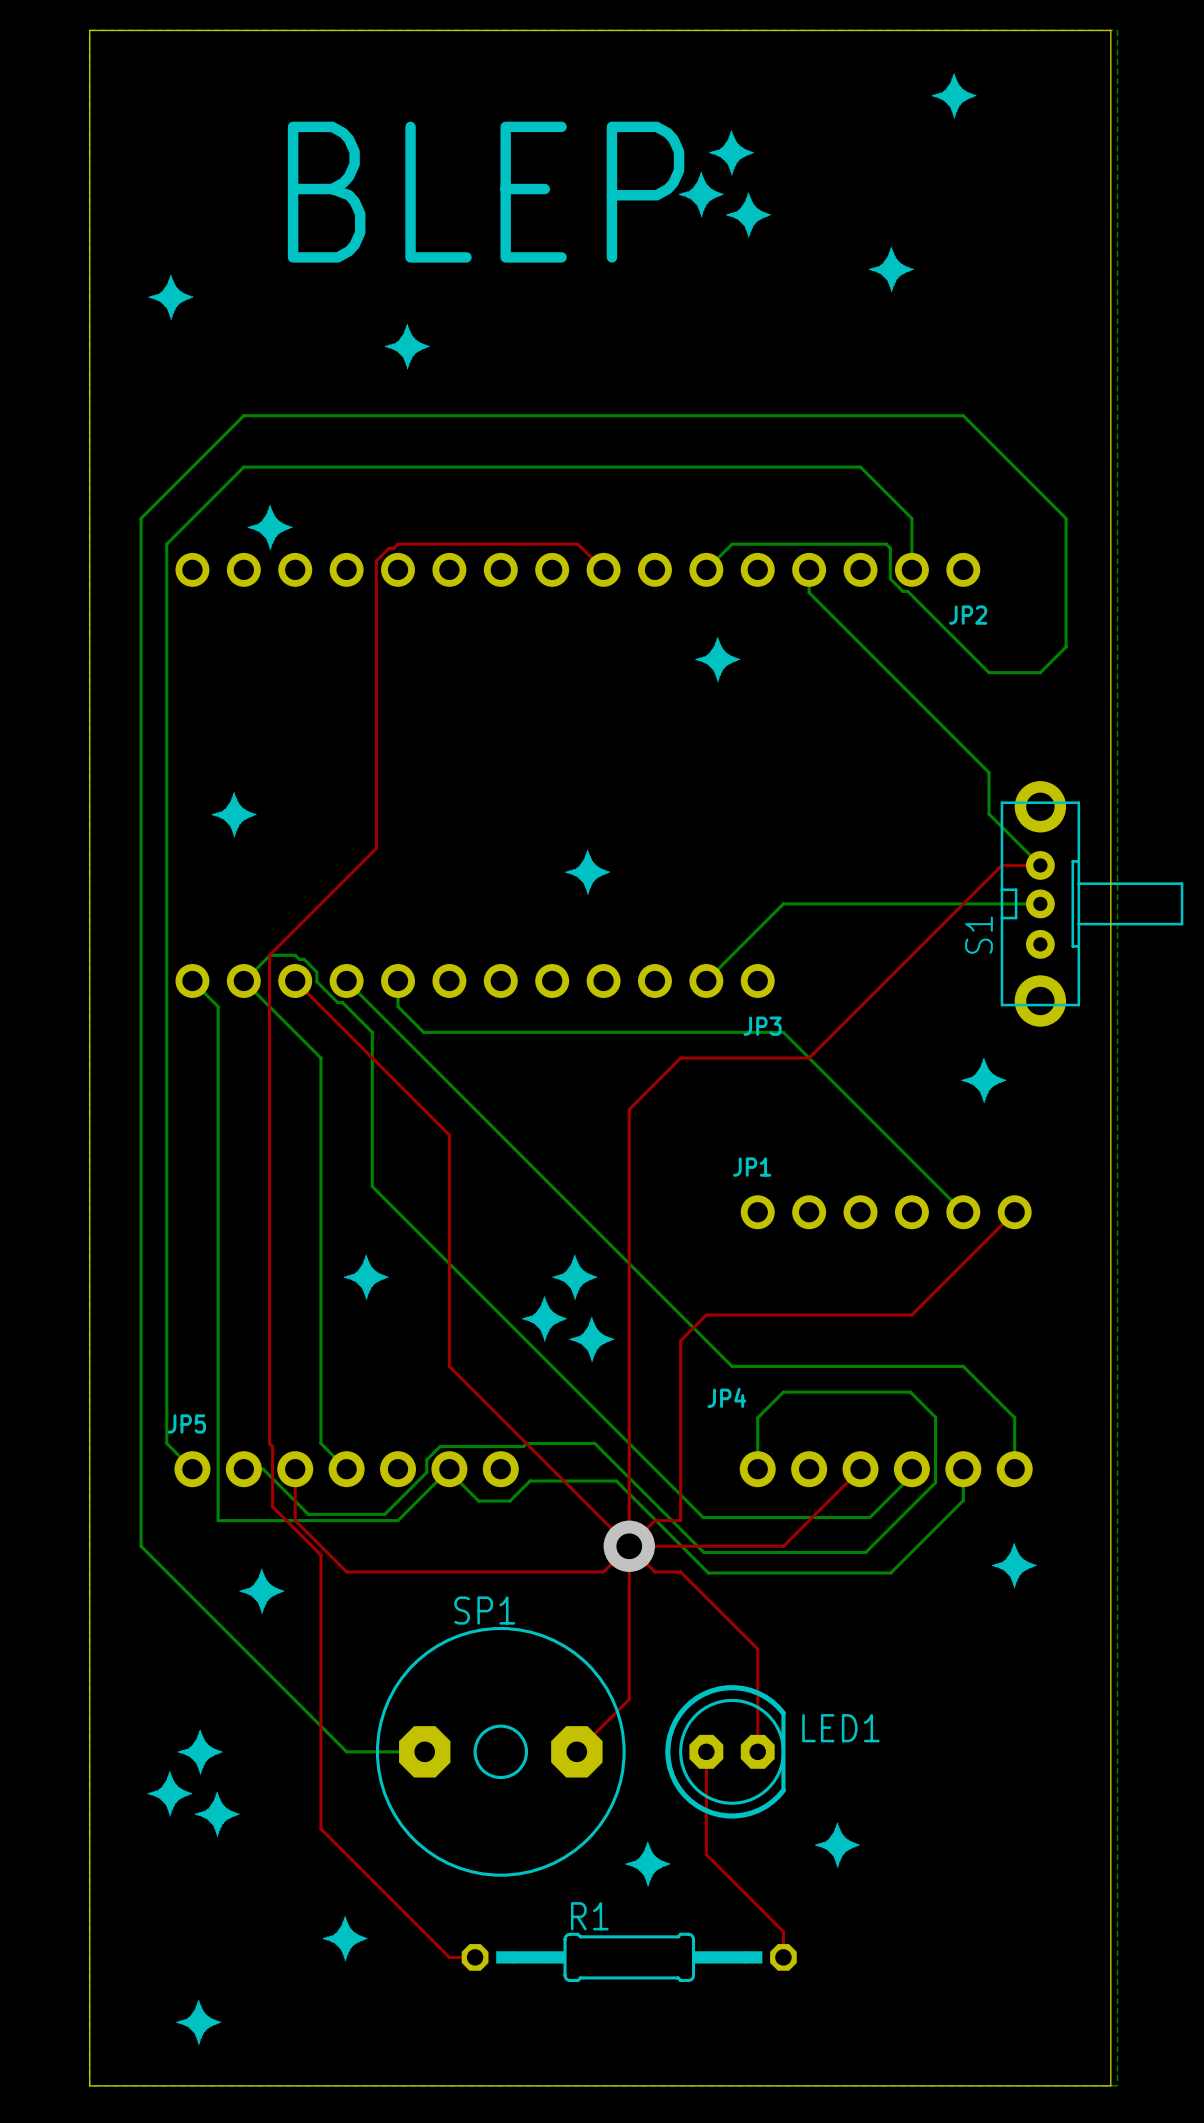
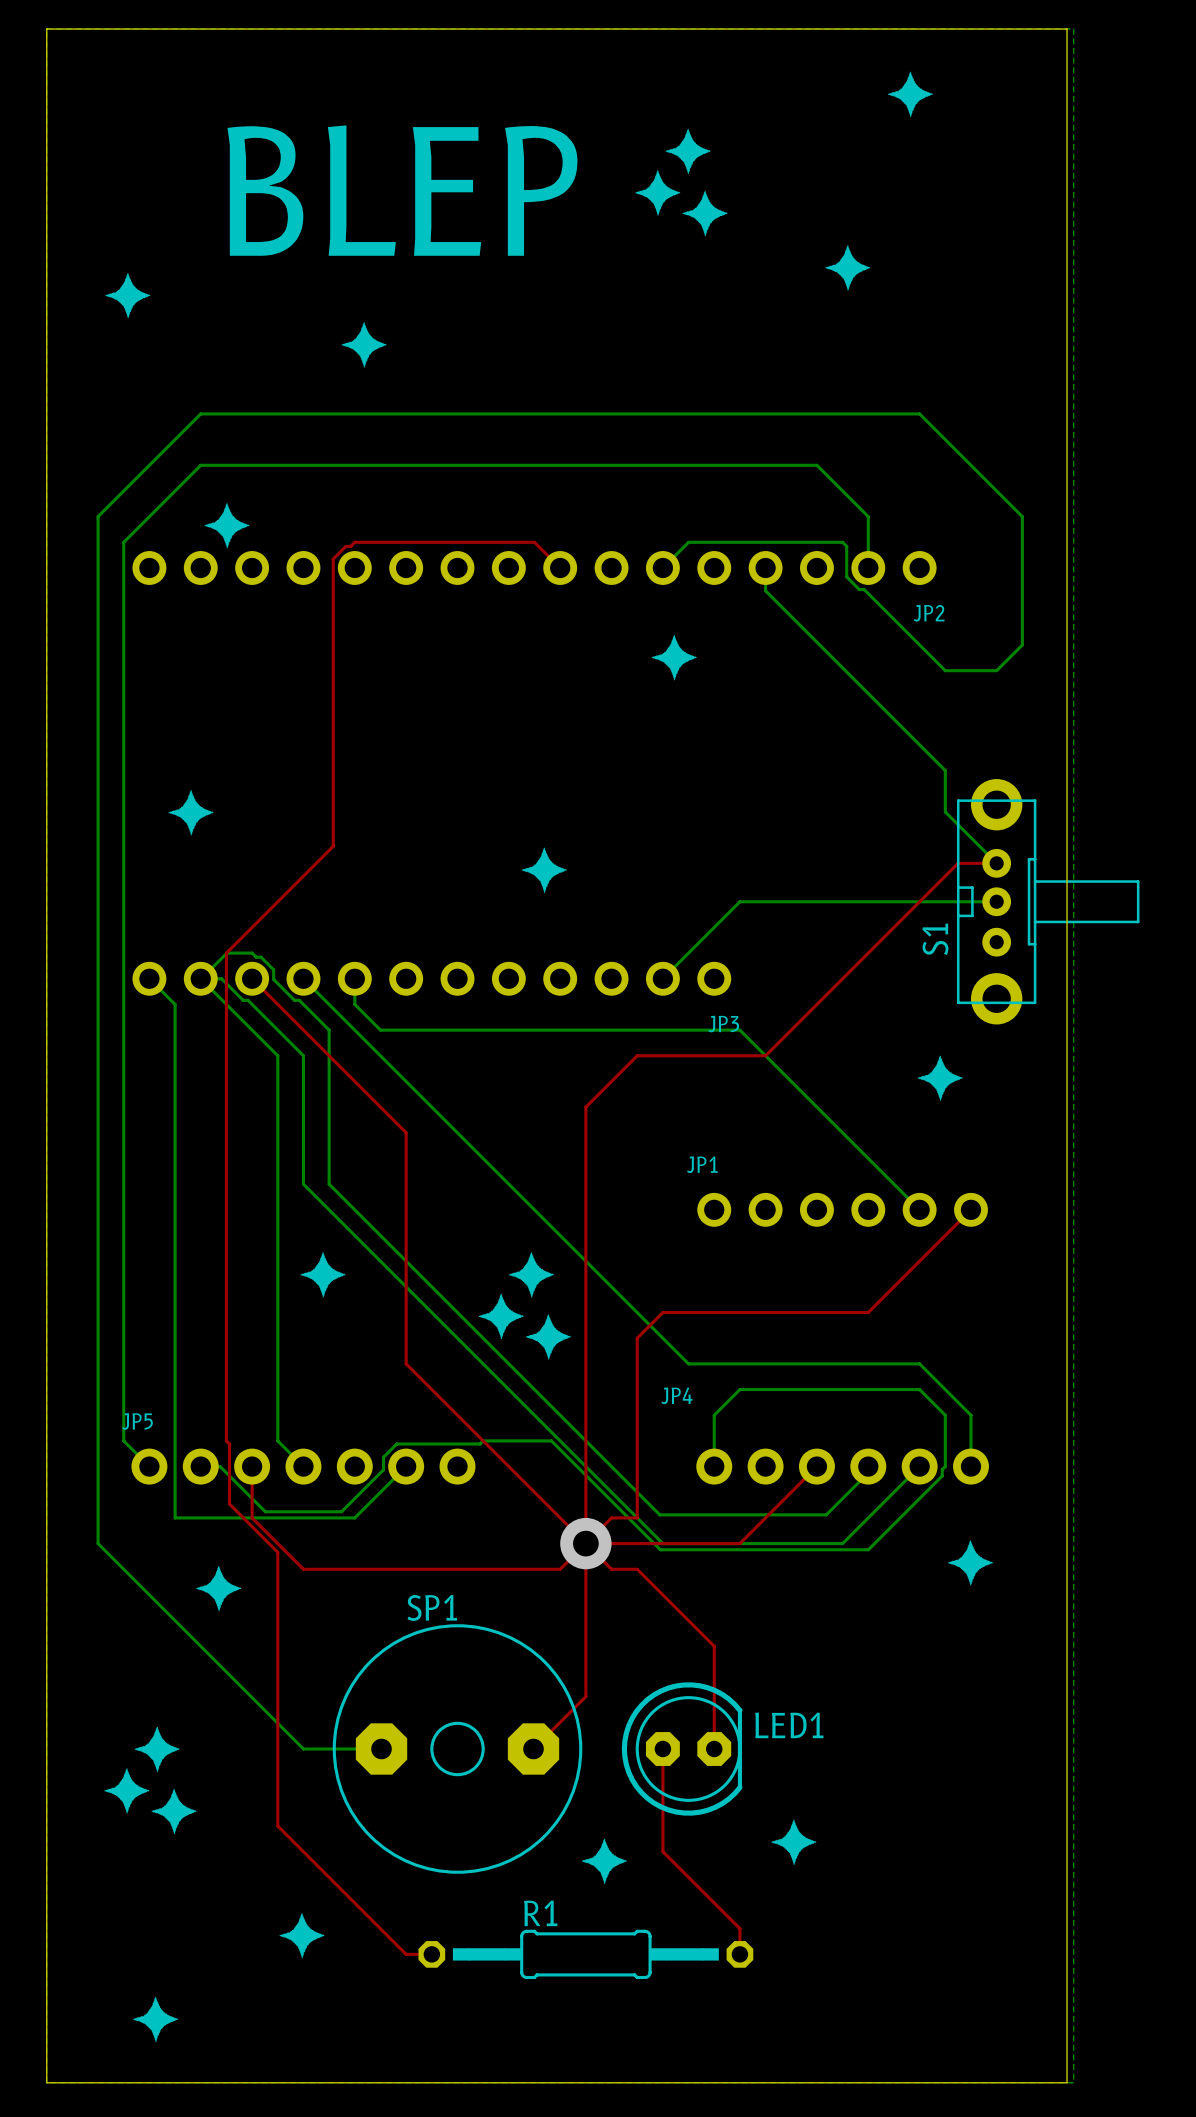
bottom track: (910, 1392) (935, 1417) (935, 1482) (865, 1552) -> (866, 1389) (919, 1389) (945, 1415) (945, 1466) (942, 1469) (942, 1475) (868, 1549) (822, 1549)
bottom track: (449, 1469) (449, 1471) (478, 1501) (510, 1501) (530, 1481) (616, 1481) (708, 1573) (890, 1573) (963, 1500) (963, 1469) -> (201, 978) (221, 978) (243, 1000) (248, 1000) (303, 1055) (303, 1184) (662, 1543) (842, 1543) (919, 1466)

